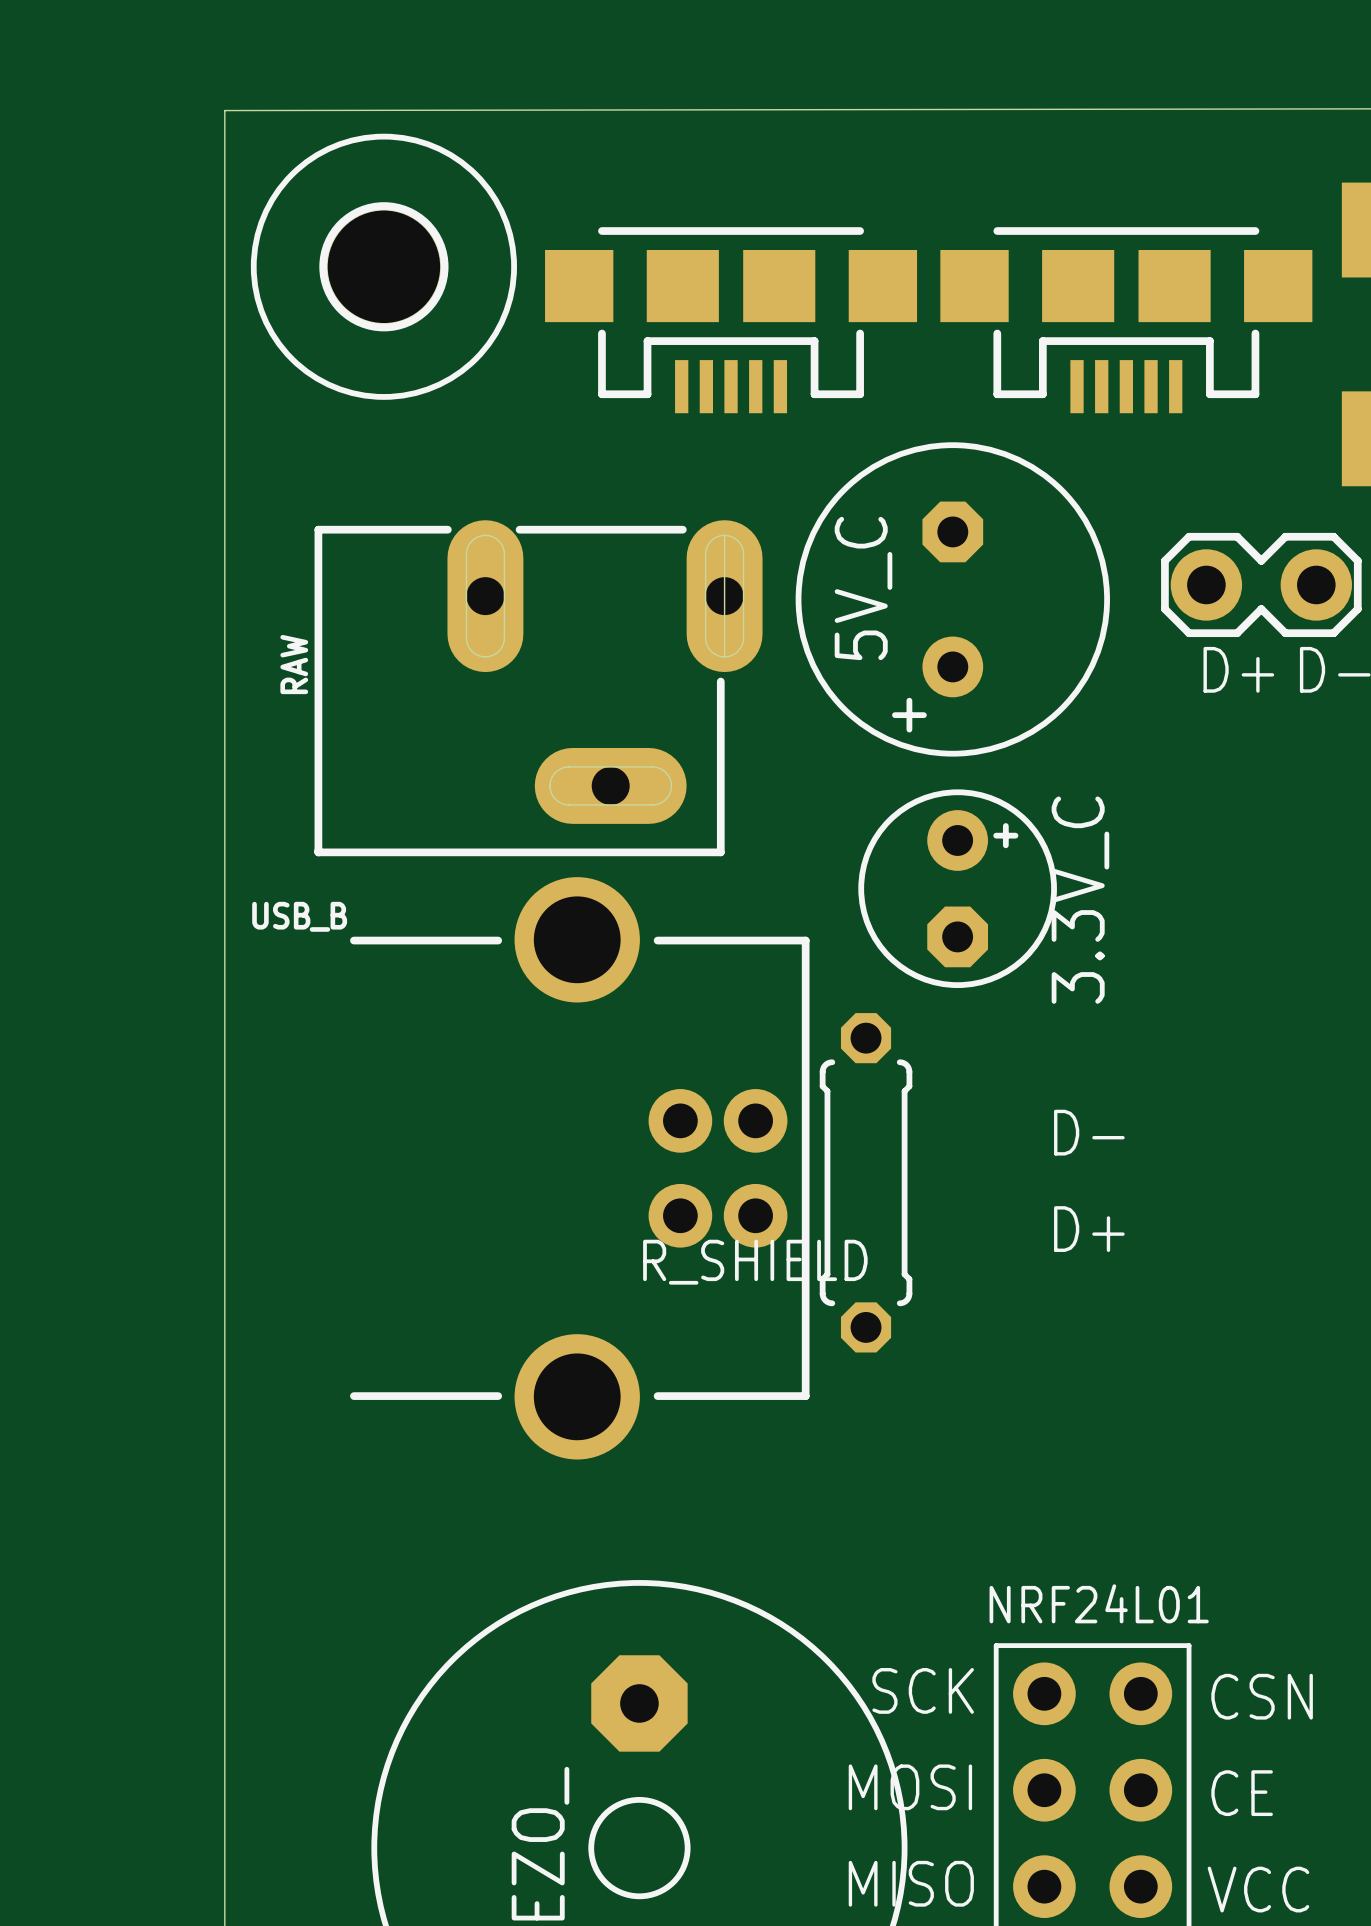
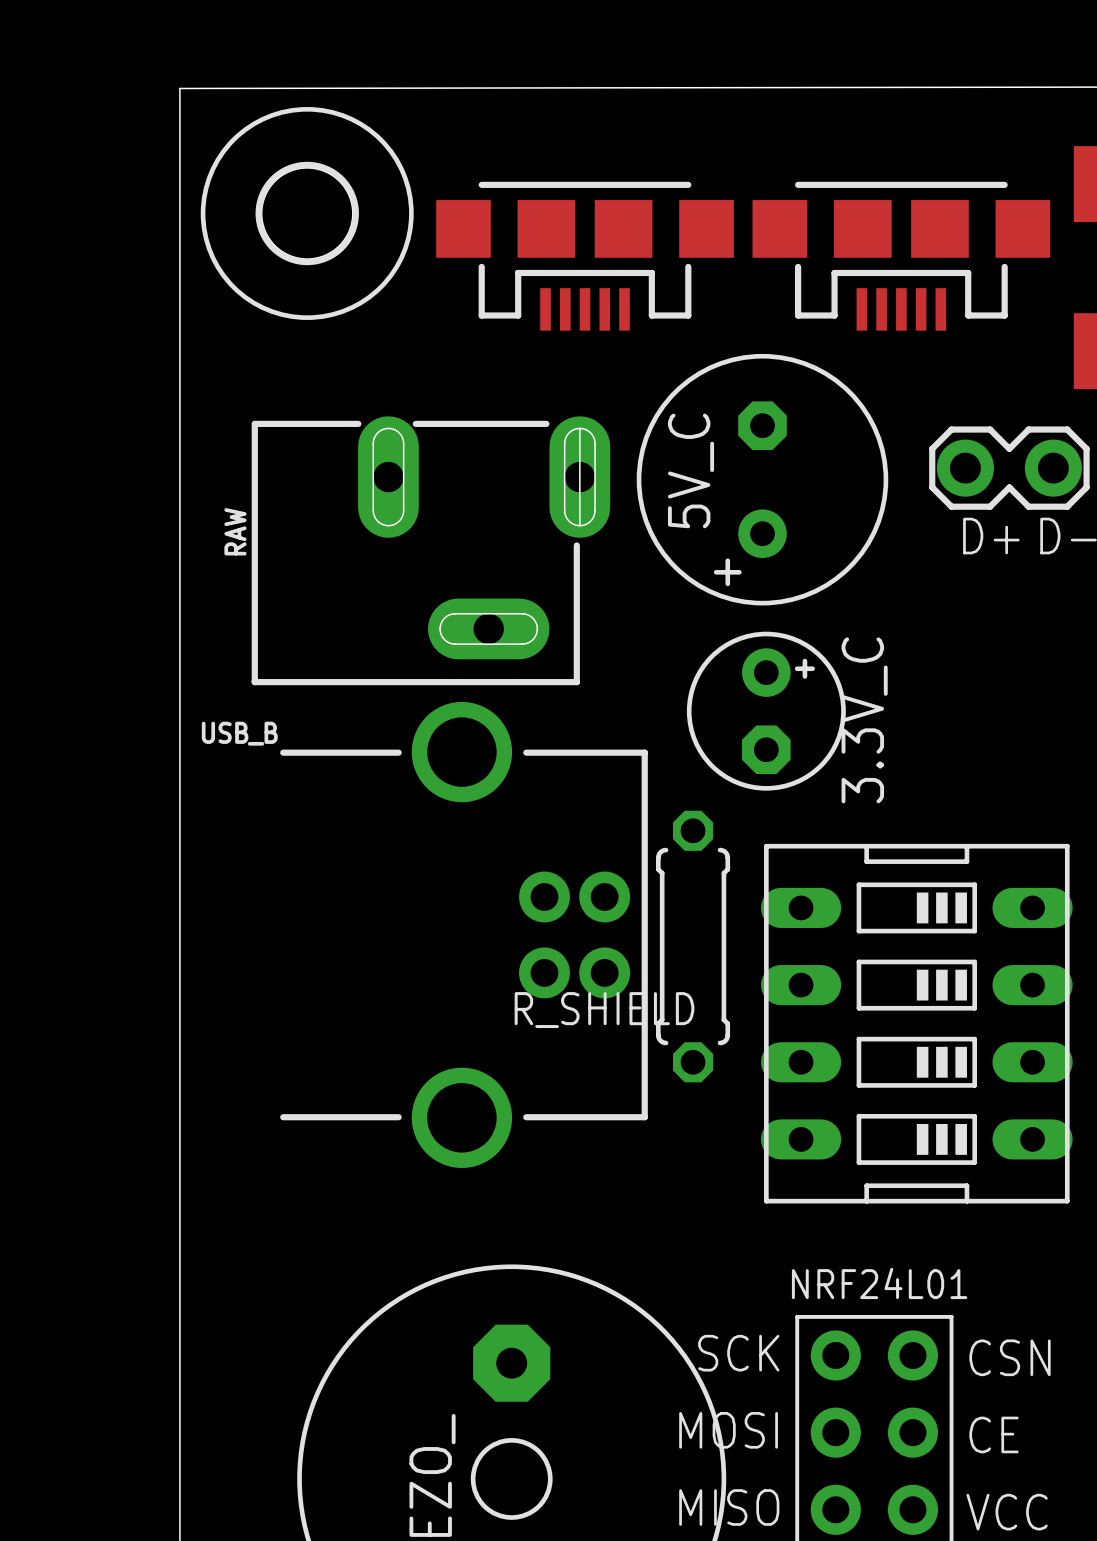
text: D- (1089, 1132) -> none
text: D+ (1089, 1229) -> none
part: none -> (916, 1023)

